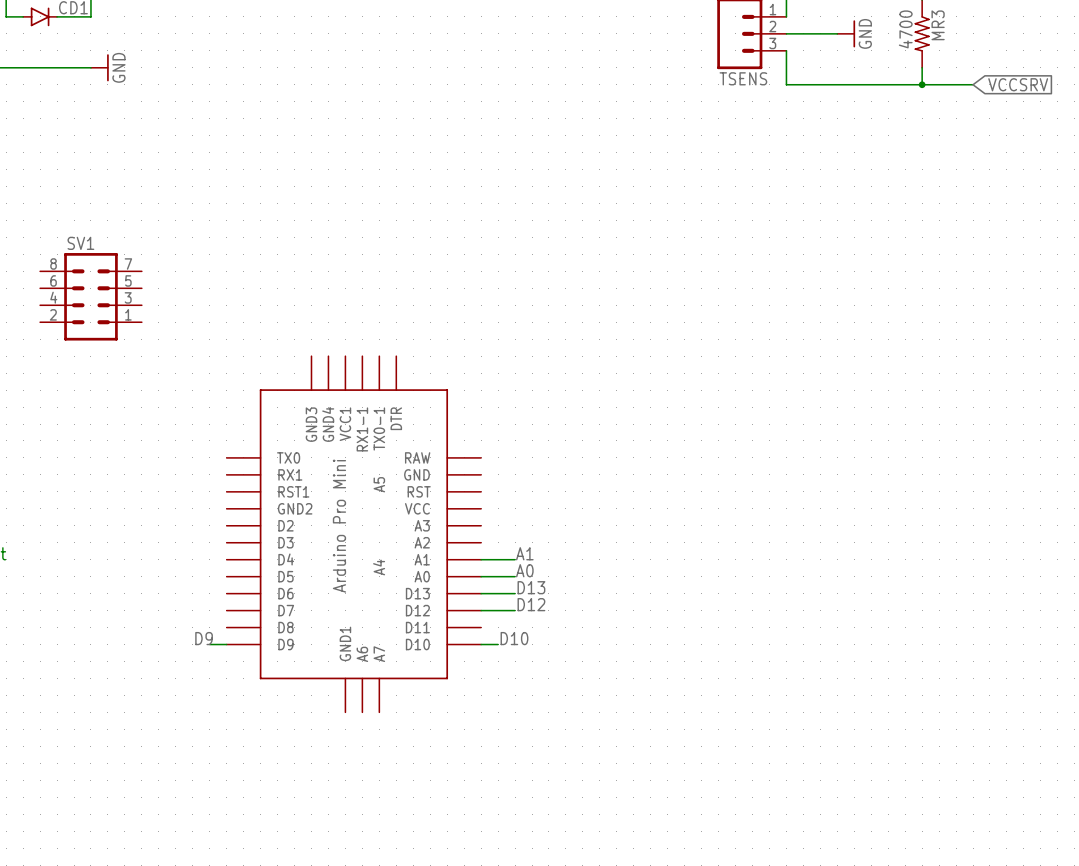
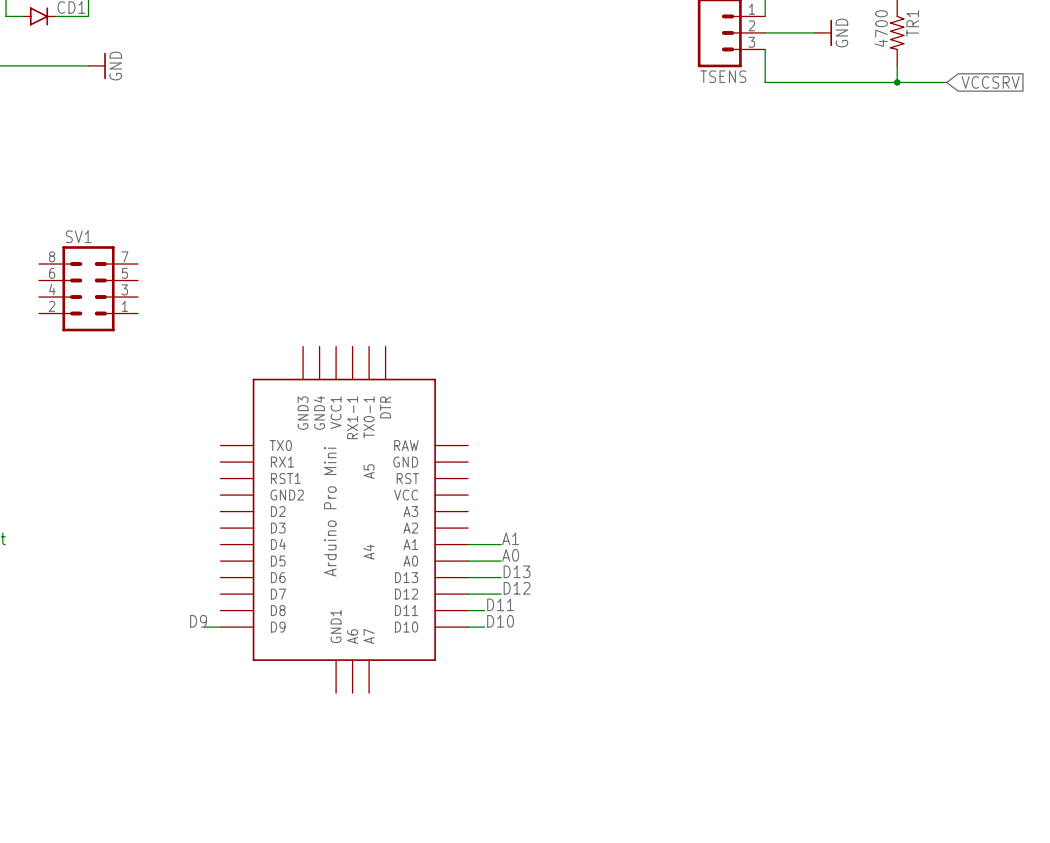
MR3 name: MR3 (938, 25) -> TR1 (912, 23)
label: none -> D11 (500, 604)
wire: none -> (468, 610) (484, 610)

